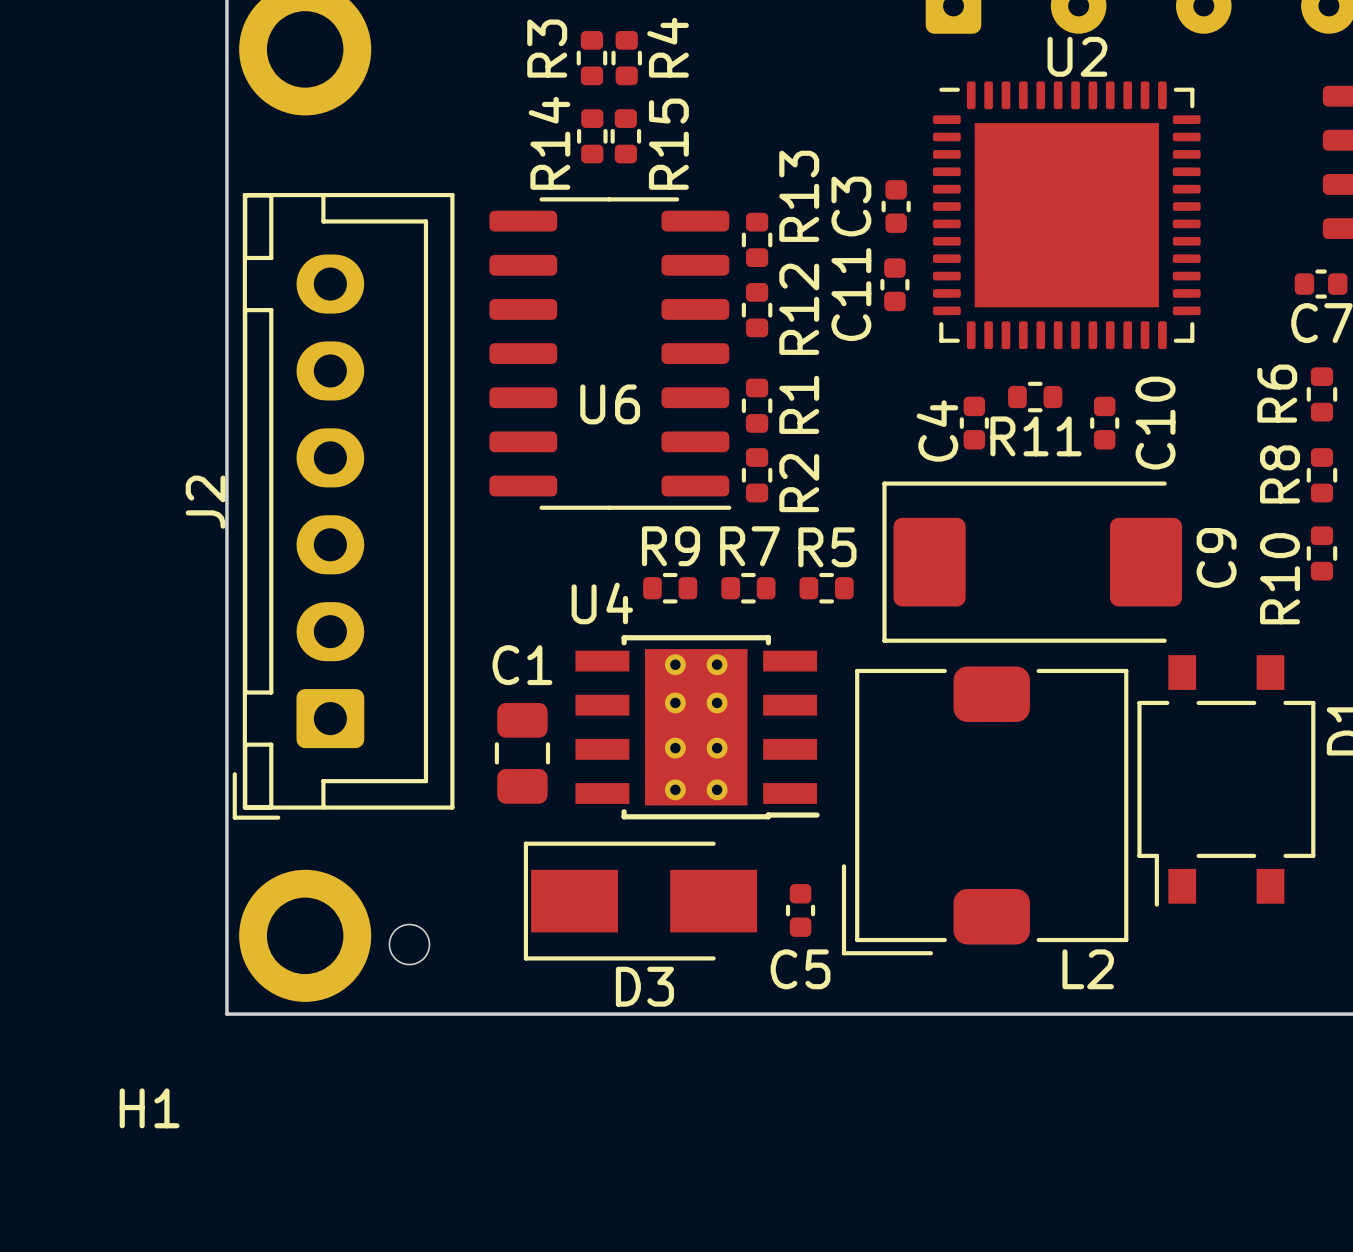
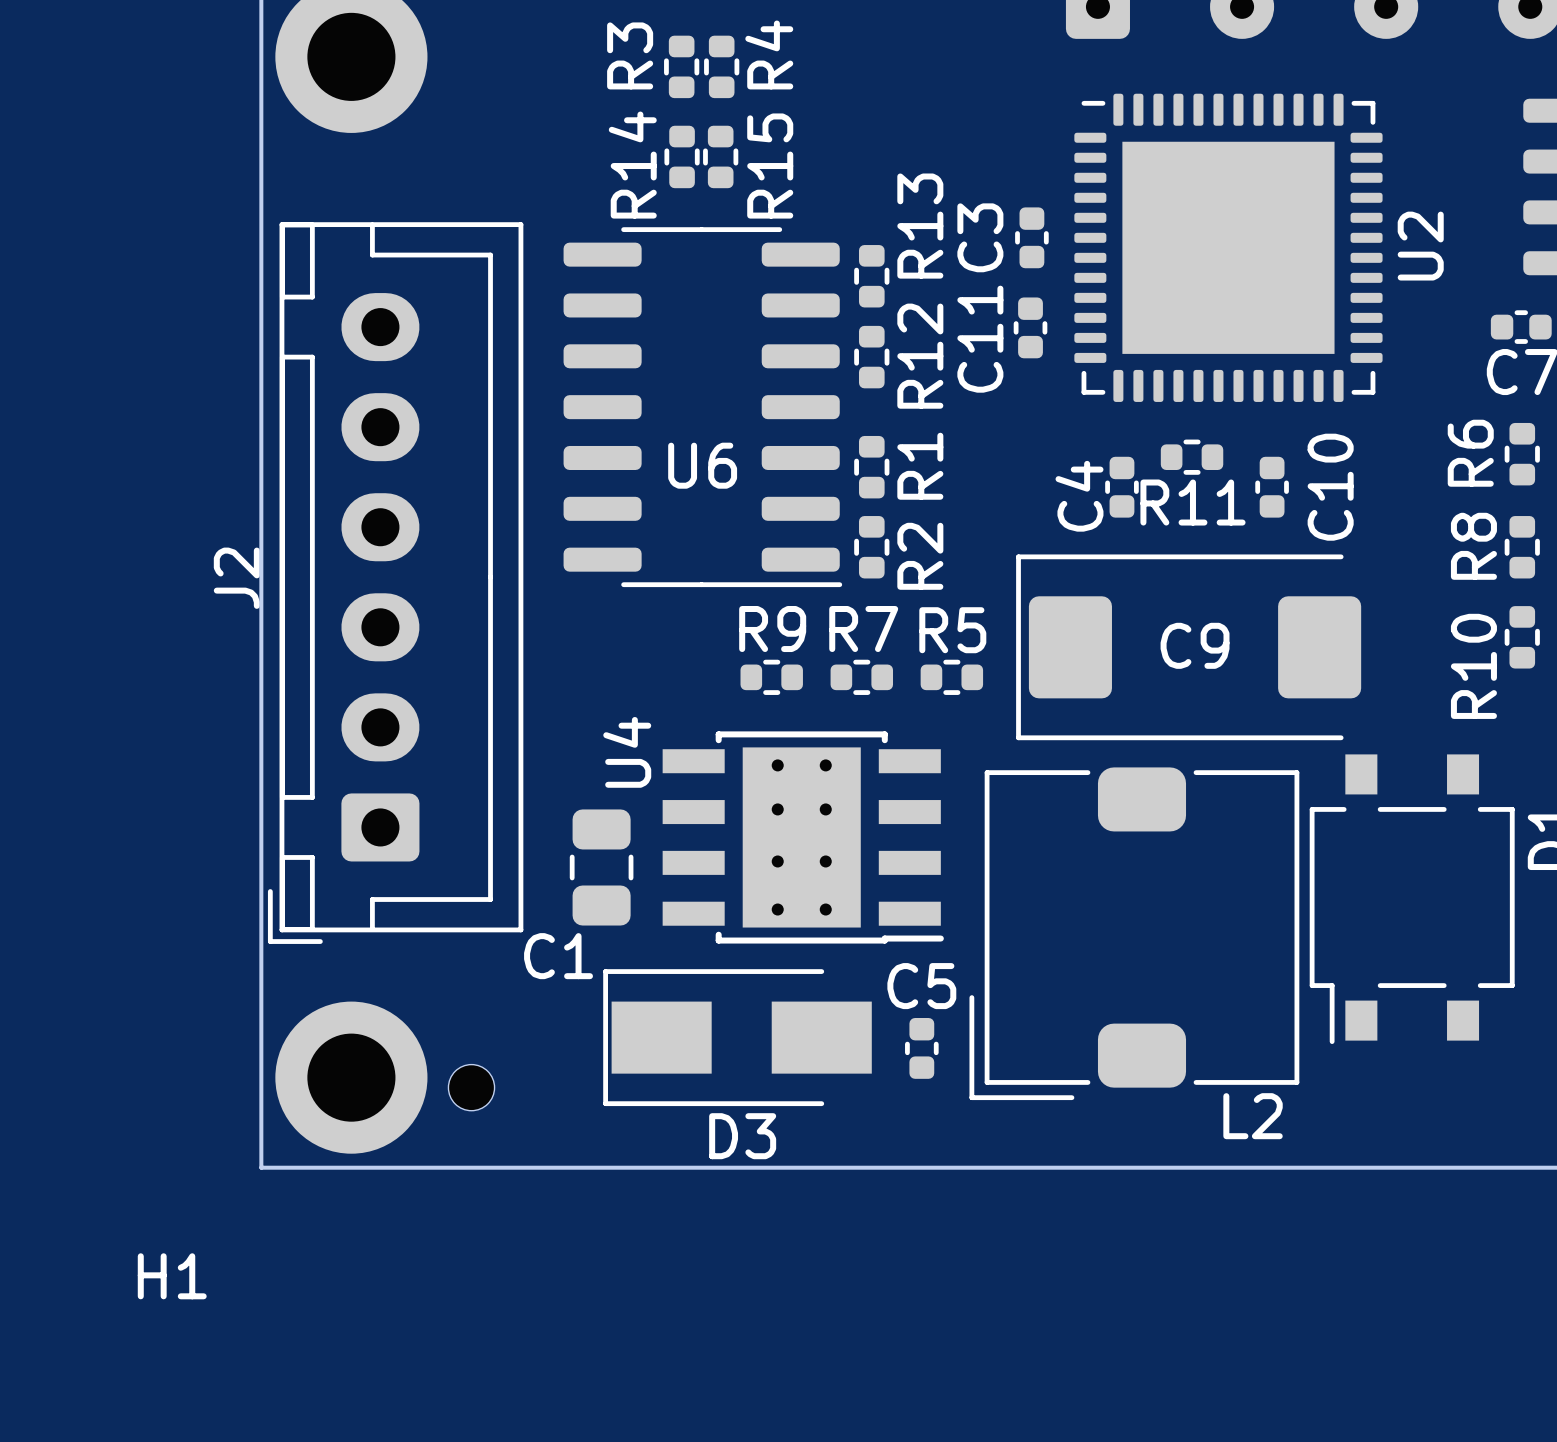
U2 name rotation: 0° (1077, 56) -> 90° counterclockwise (1420, 246)
U2 name position: U2 (1077, 56) -> U2 (1420, 246)
C9 name rotation: 0° (1216, 557) -> 90° clockwise (1195, 645)
C9 name position: C9 (1216, 557) -> C9 (1195, 645)
U4 name rotation: 0° (602, 603) -> 90° counterclockwise (627, 752)
C1 name position: C1 (522, 665) -> C1 (558, 956)
C5 name position: C5 (800, 969) -> C5 (921, 986)

